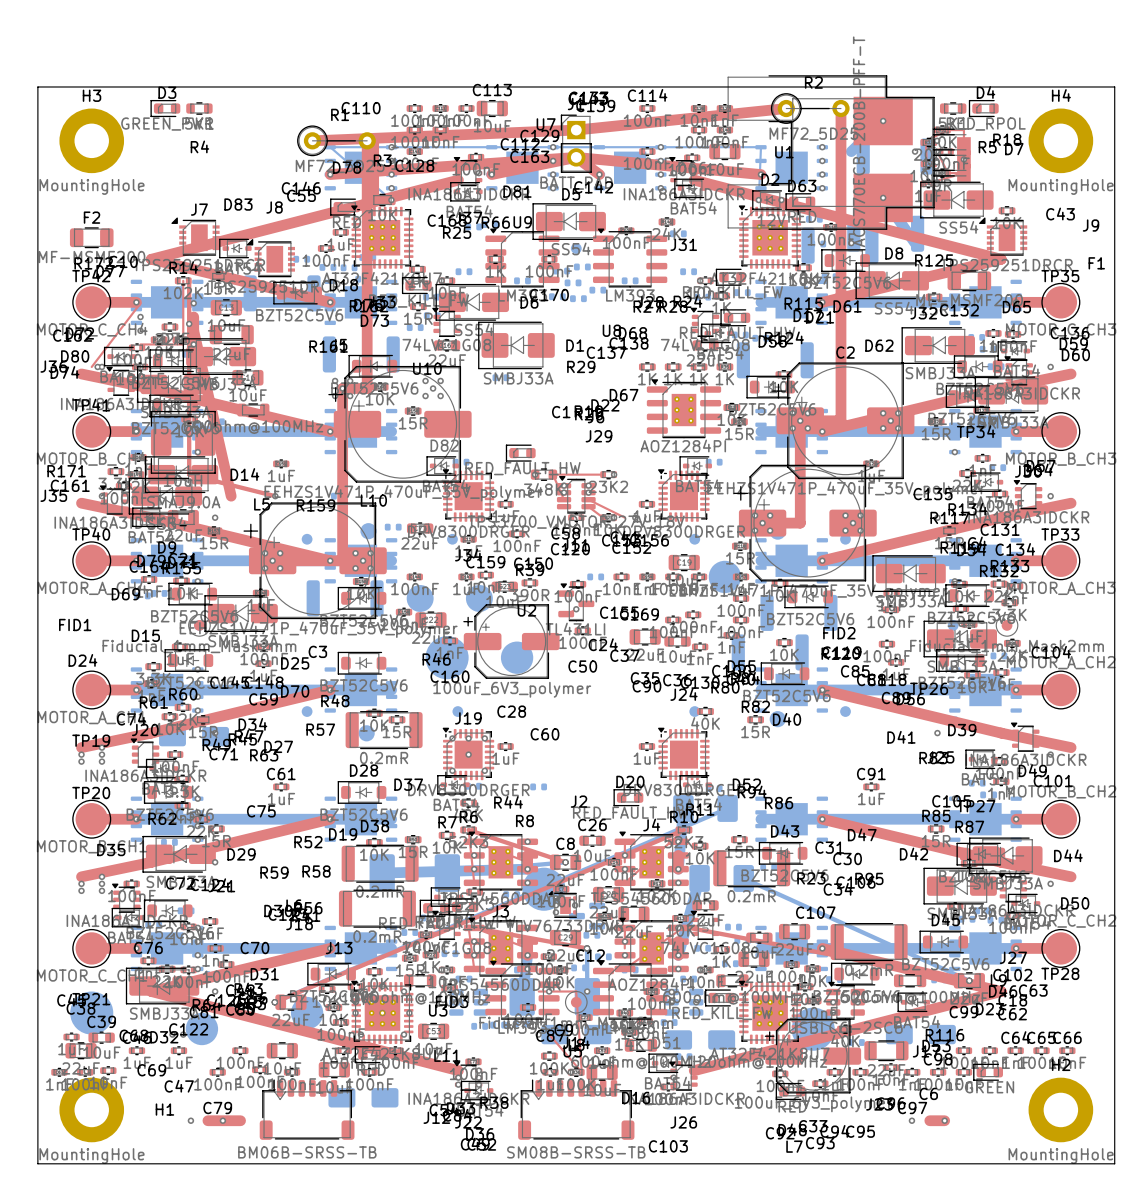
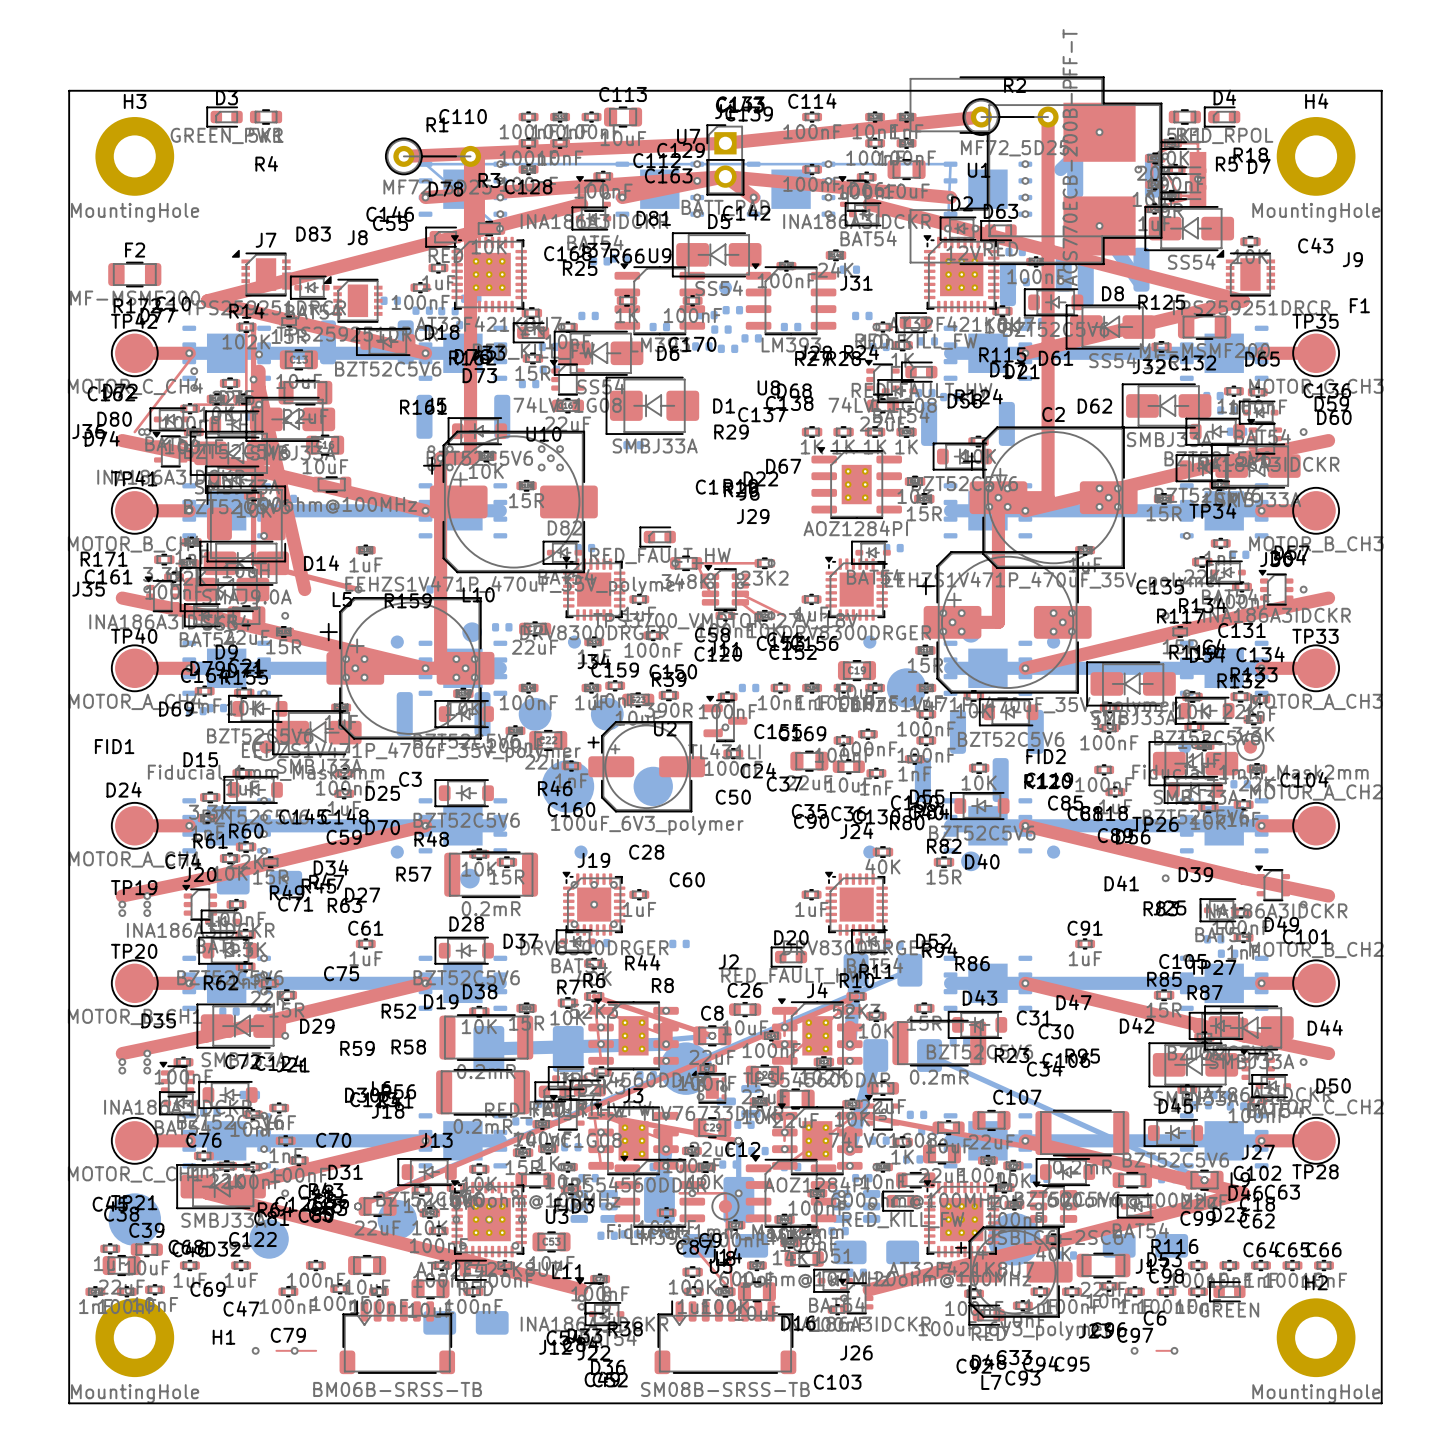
top track width: thick (207, 1120) (240, 1120) -> thin (276, 1350) (316, 1350)
top track width: thick (929, 1120) (944, 1120) -> thin (1156, 1350) (1174, 1350)

